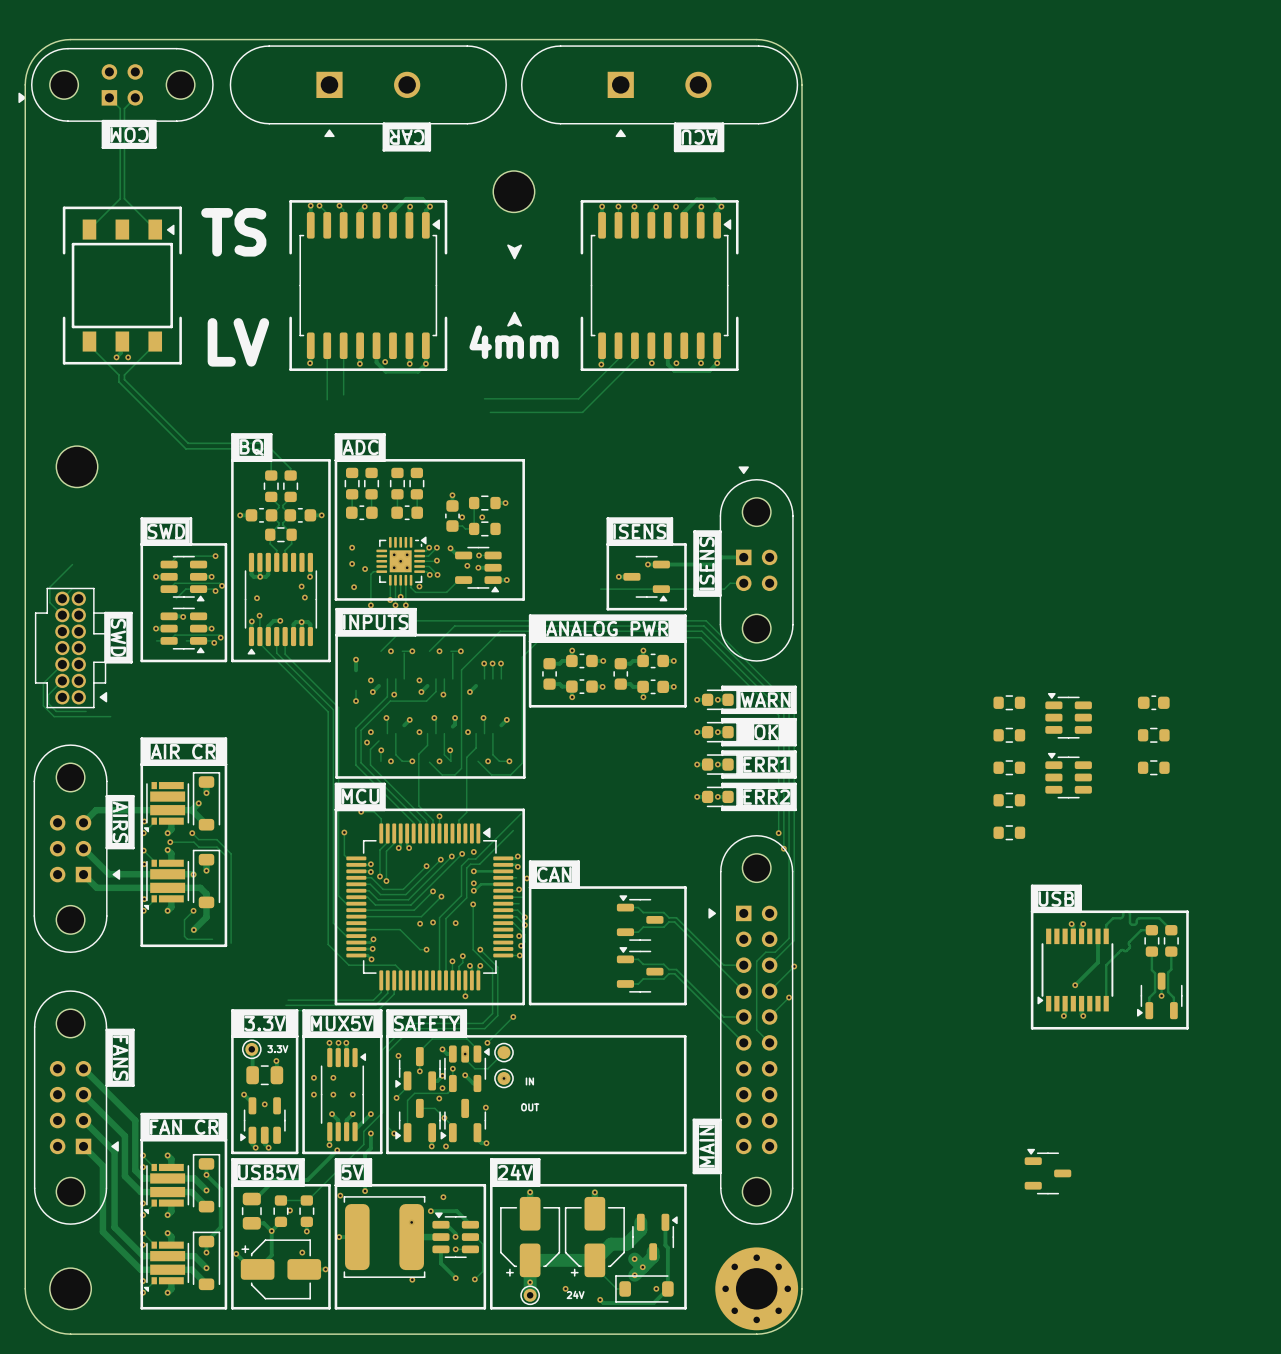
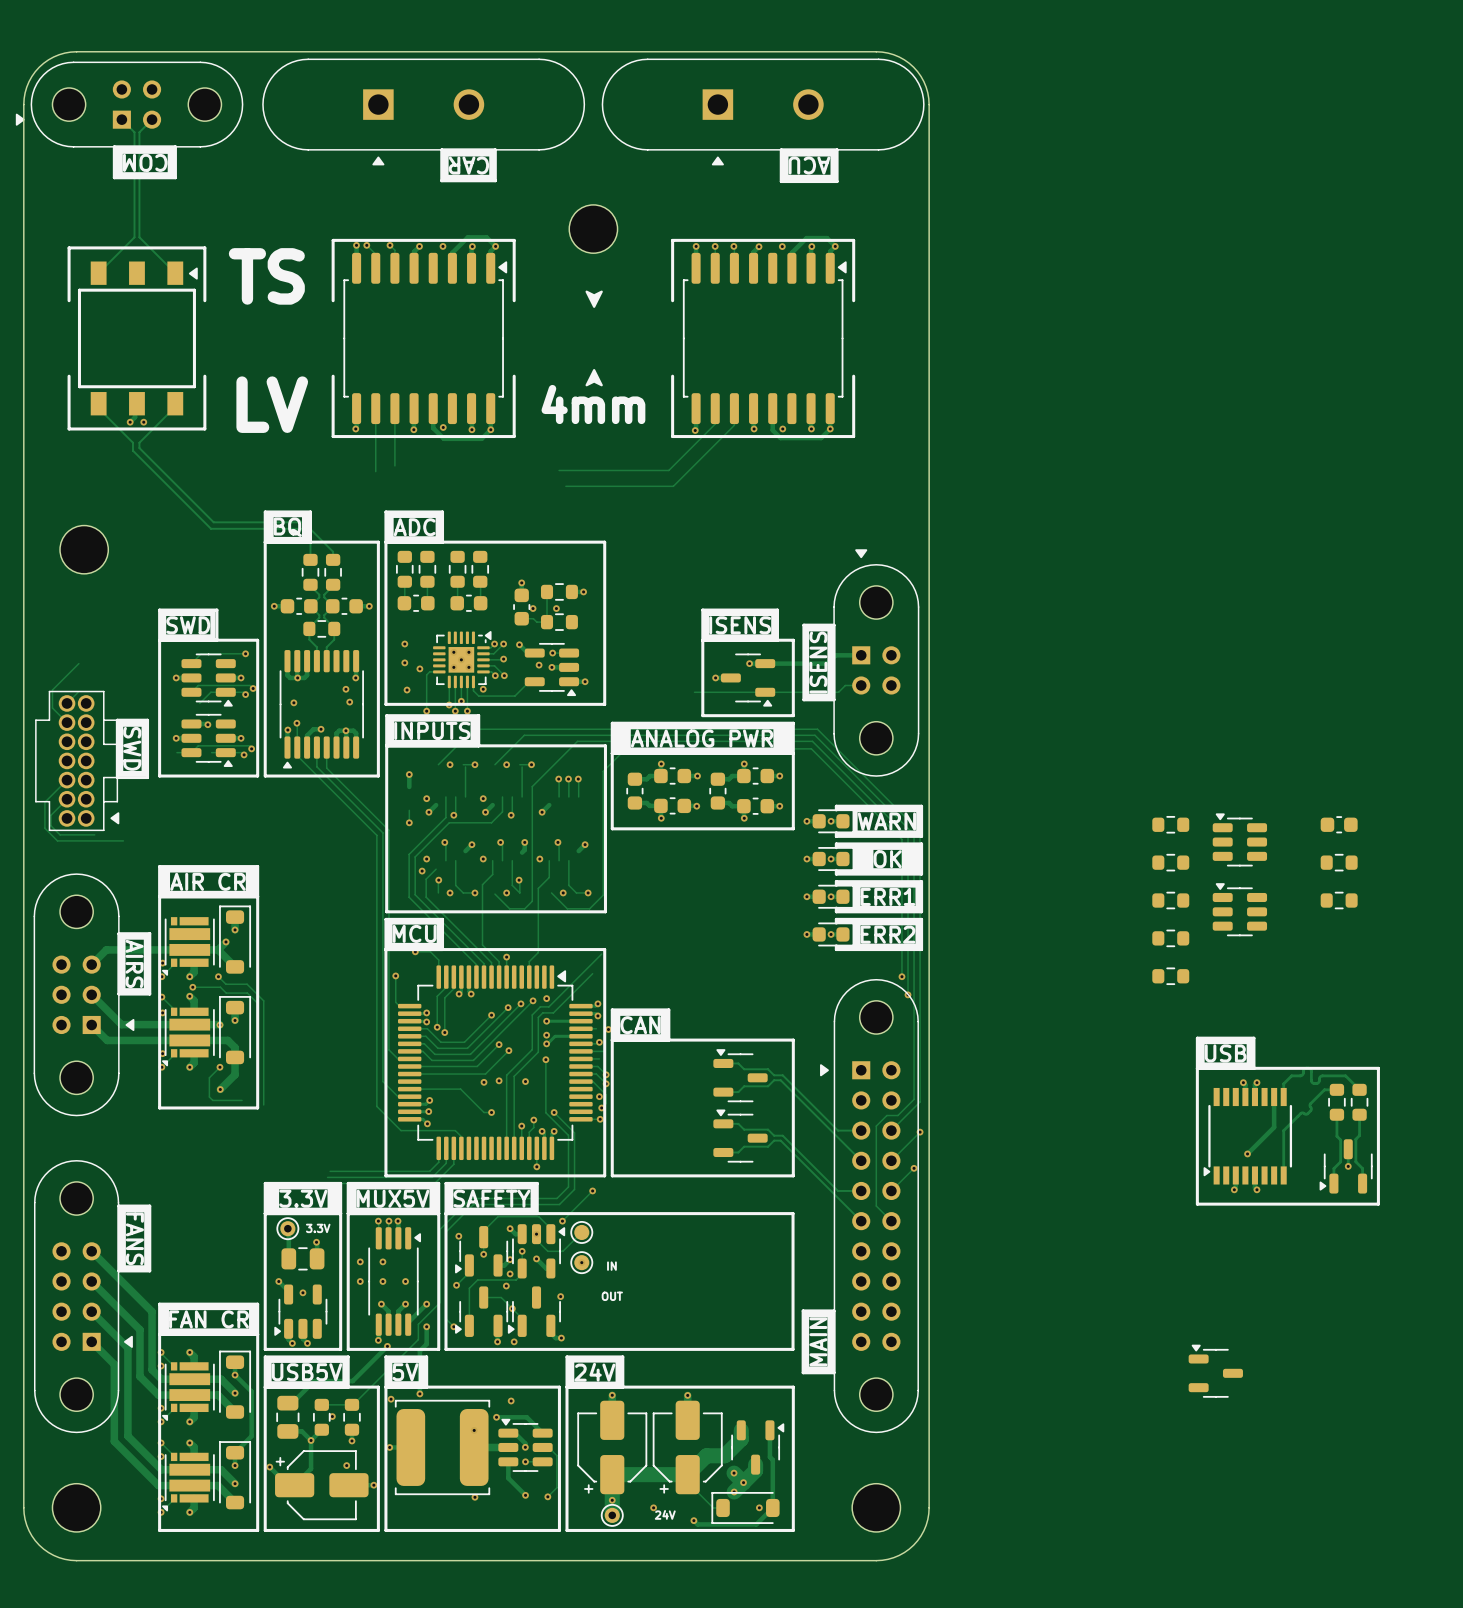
part footprint: [715, 1247, 799, 1331] -> [852, 1483, 901, 1532]

